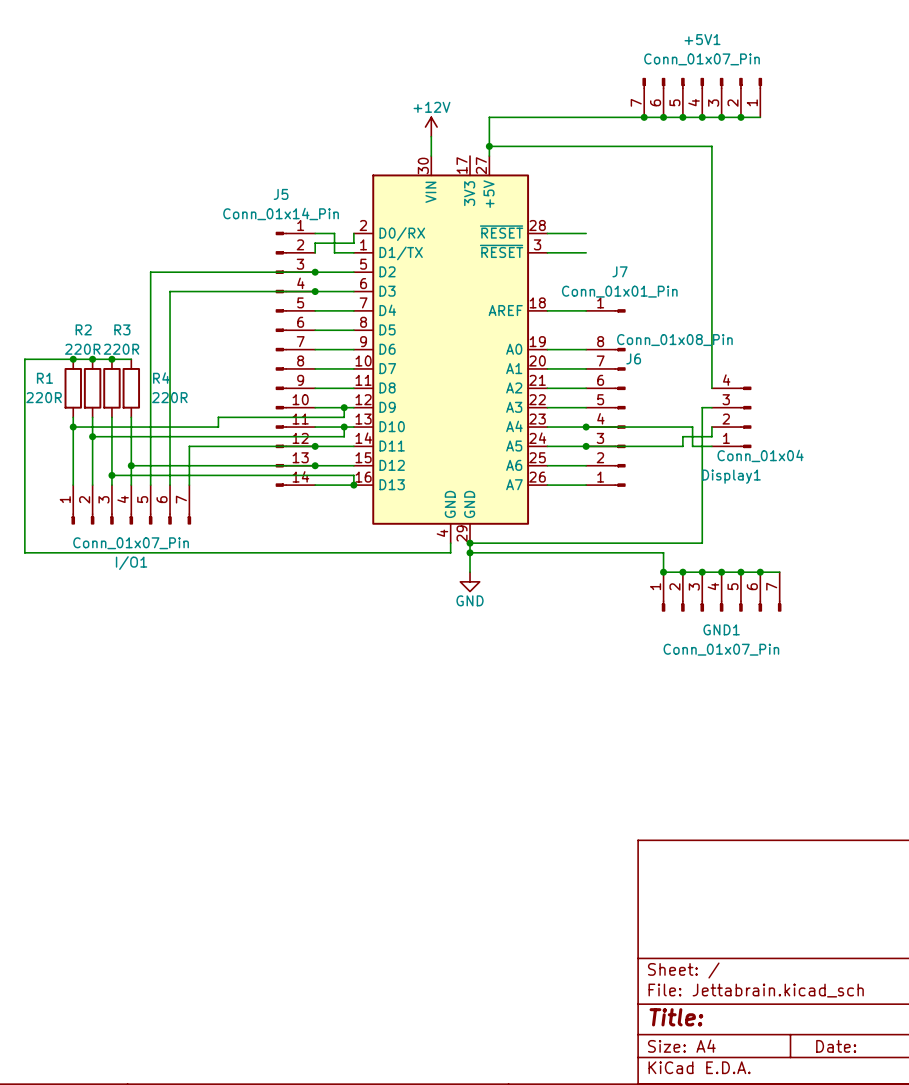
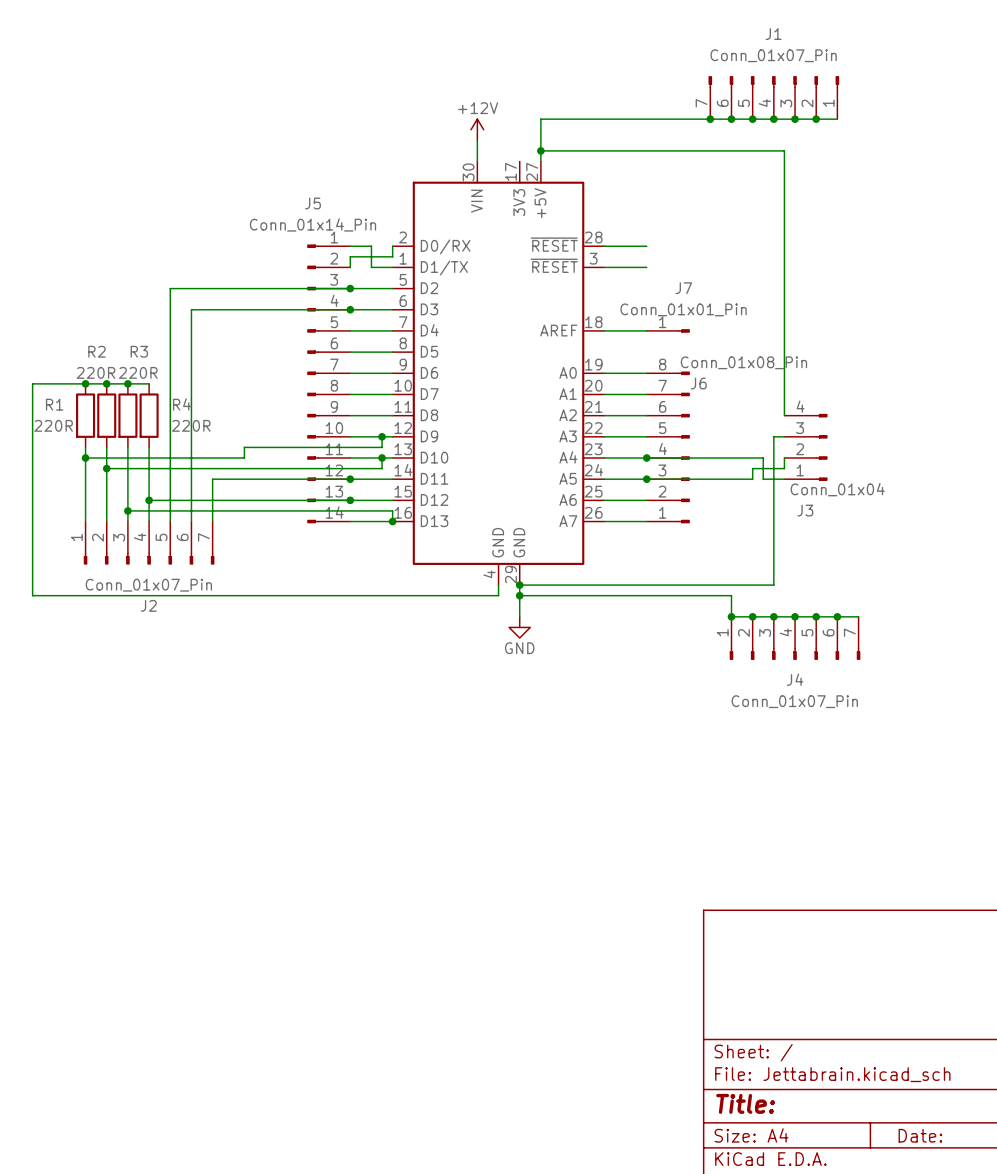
+5V1 name: +5V1 (702, 39) -> J1 (773, 34)
Display1 name: Display1 (731, 476) -> J3 (805, 510)
I/O1 name: I/O1 (131, 563) -> J2 (148, 605)
GND1 name: GND1 (721, 629) -> J4 (795, 679)

